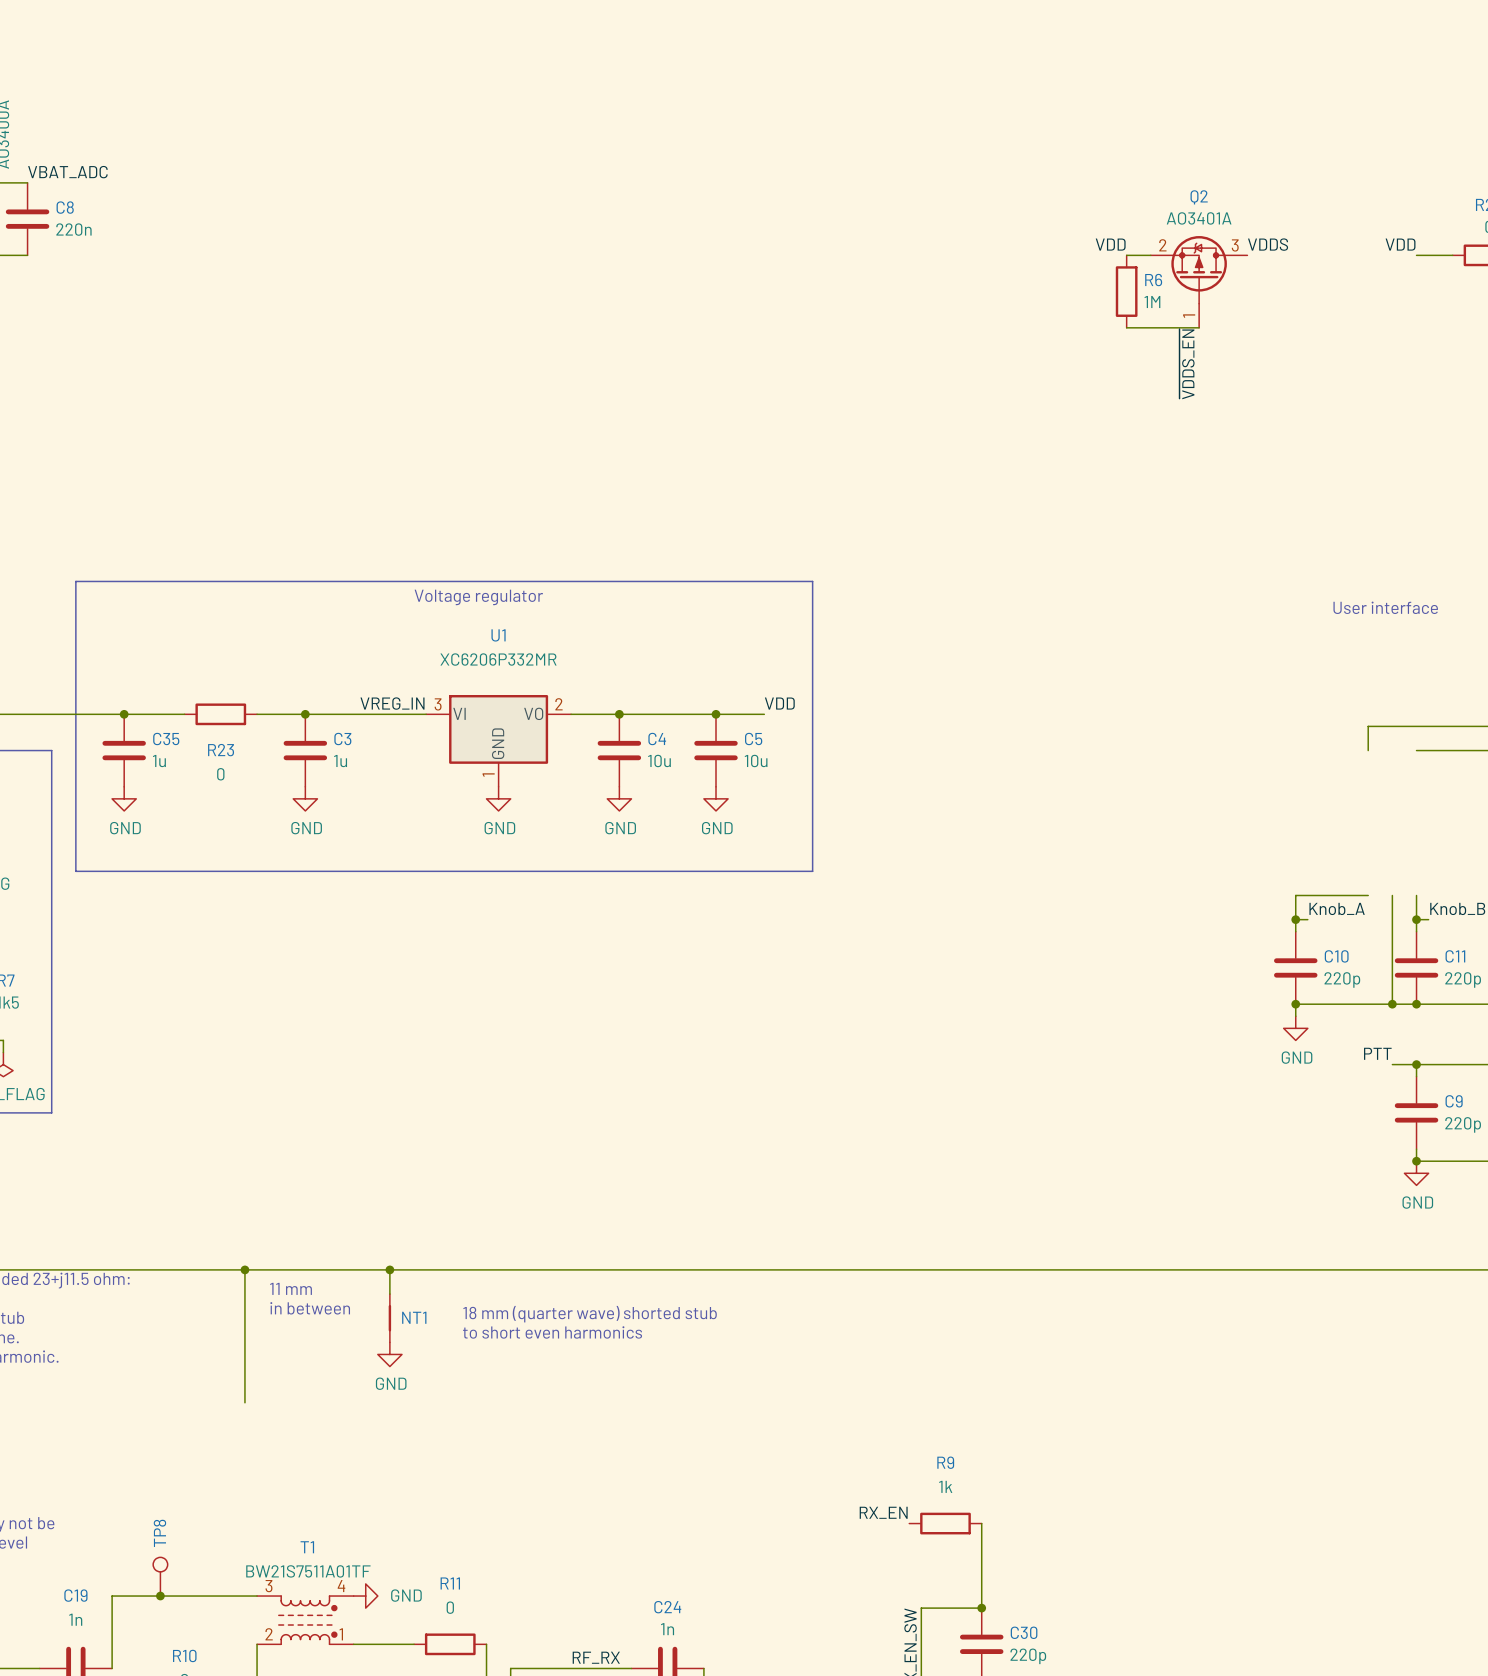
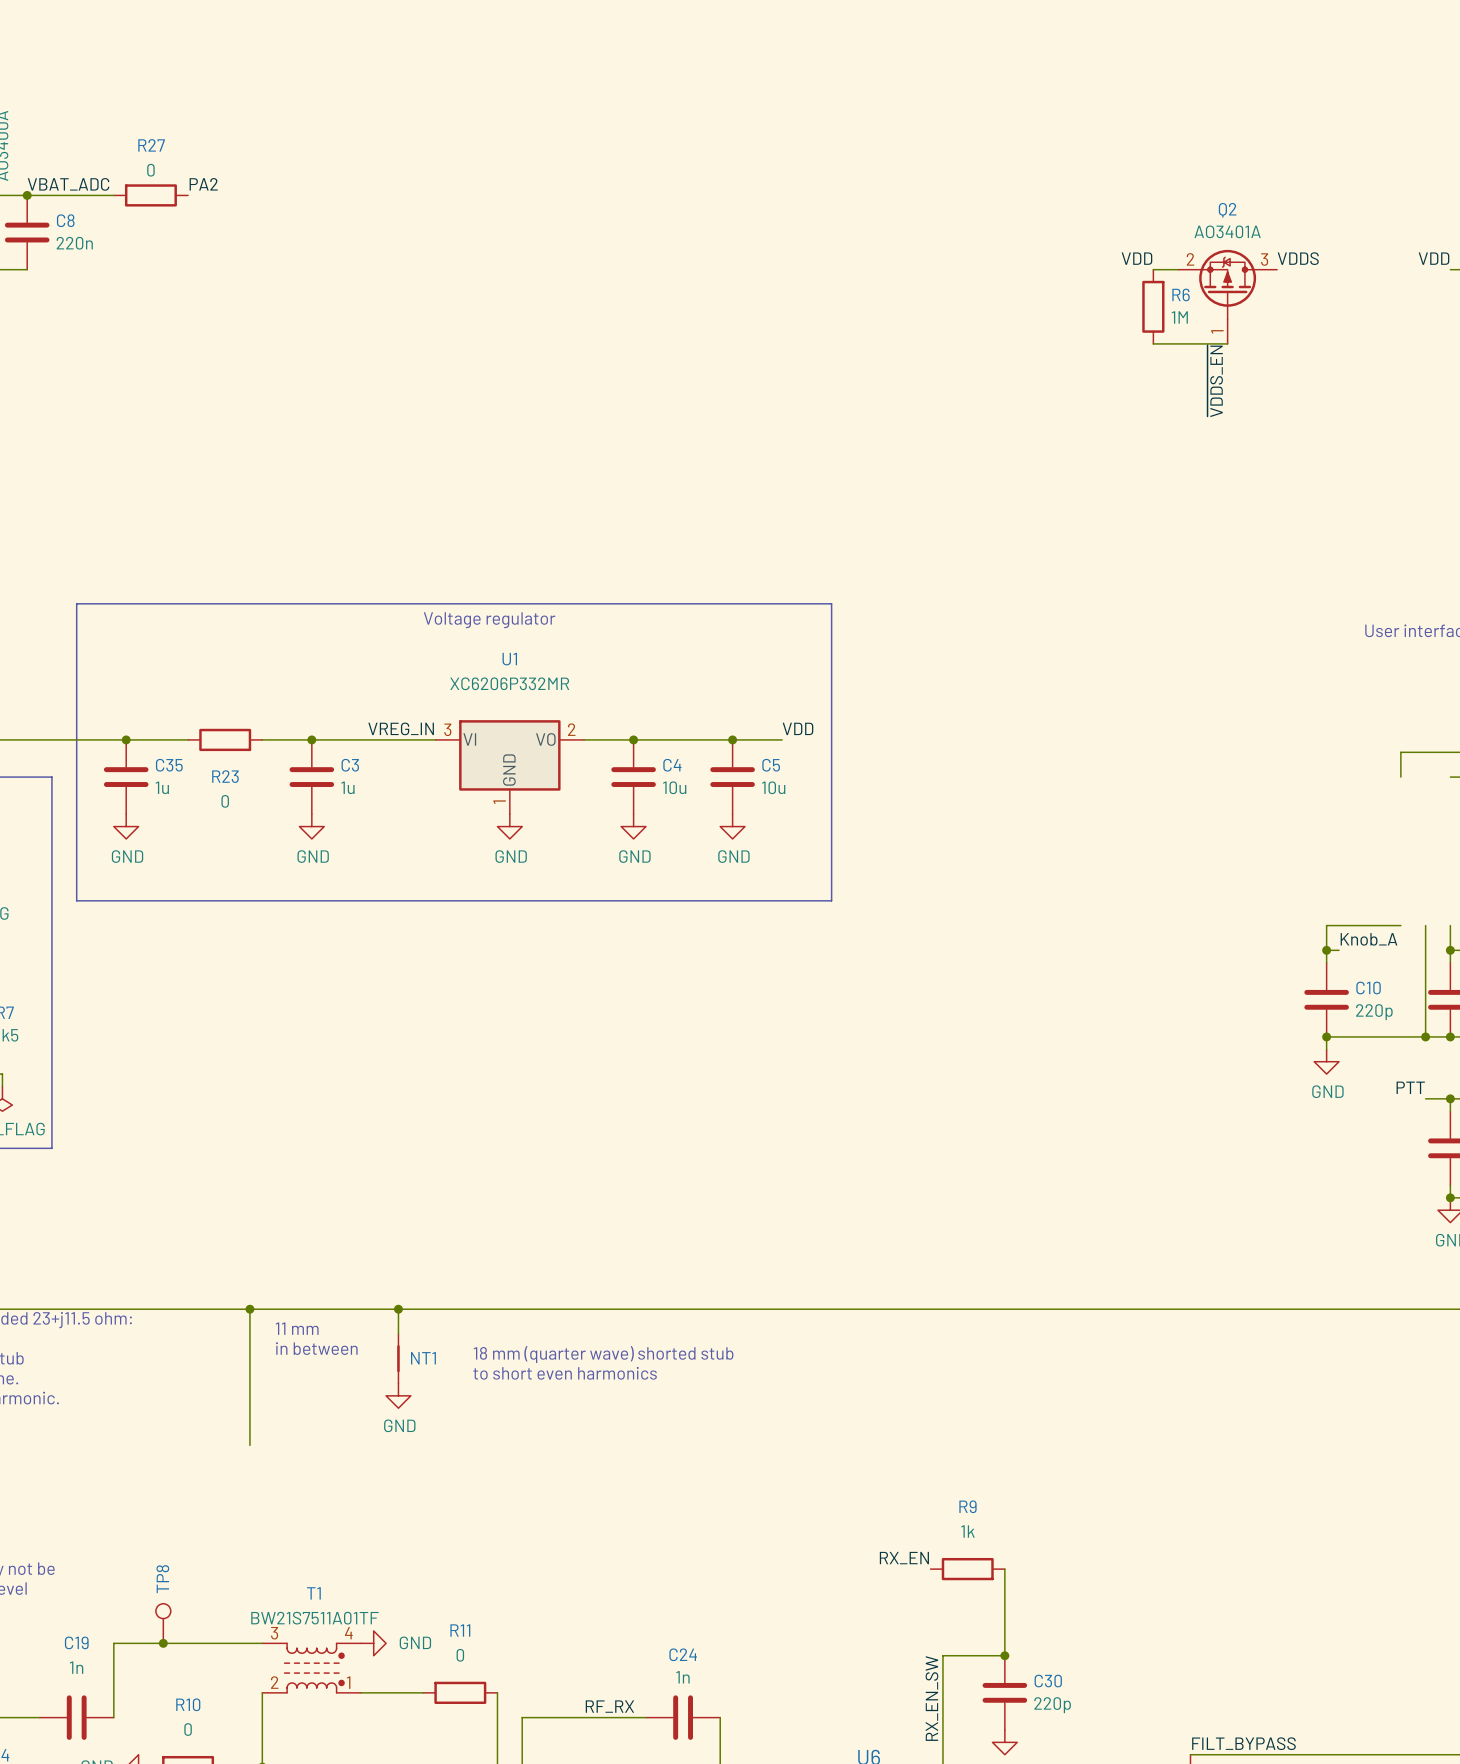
label: none -> PA2 (203, 184)
wire: none -> (27, 195) (113, 195)
junction: none -> (27, 195)
R27: none -> 0 (150, 195)

